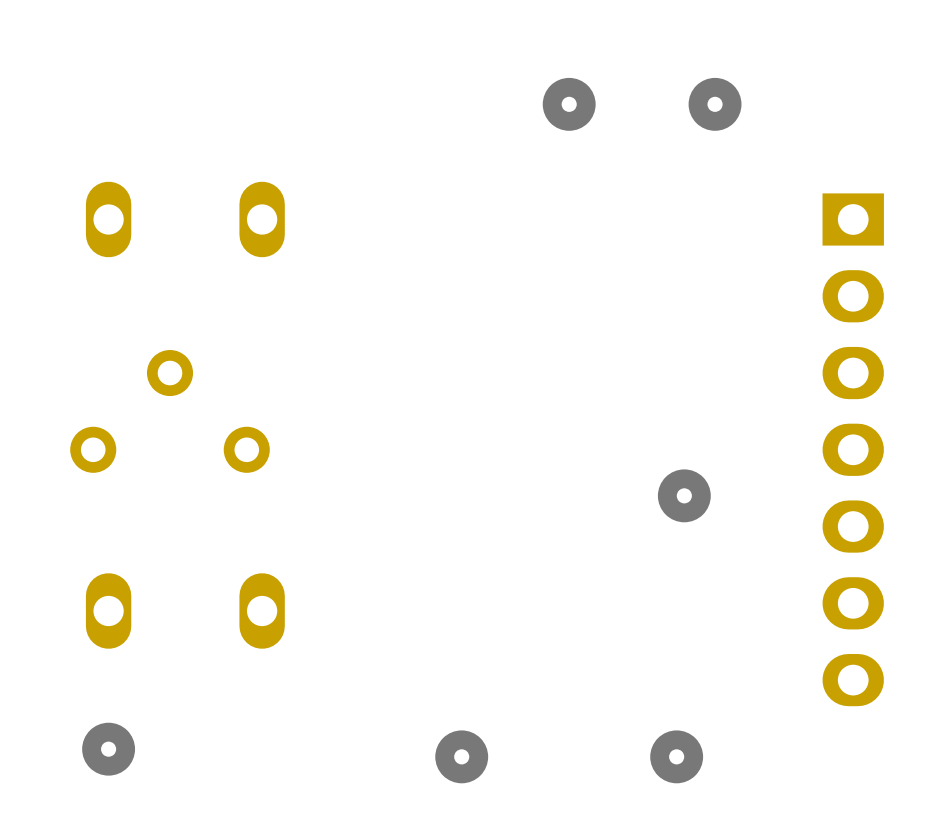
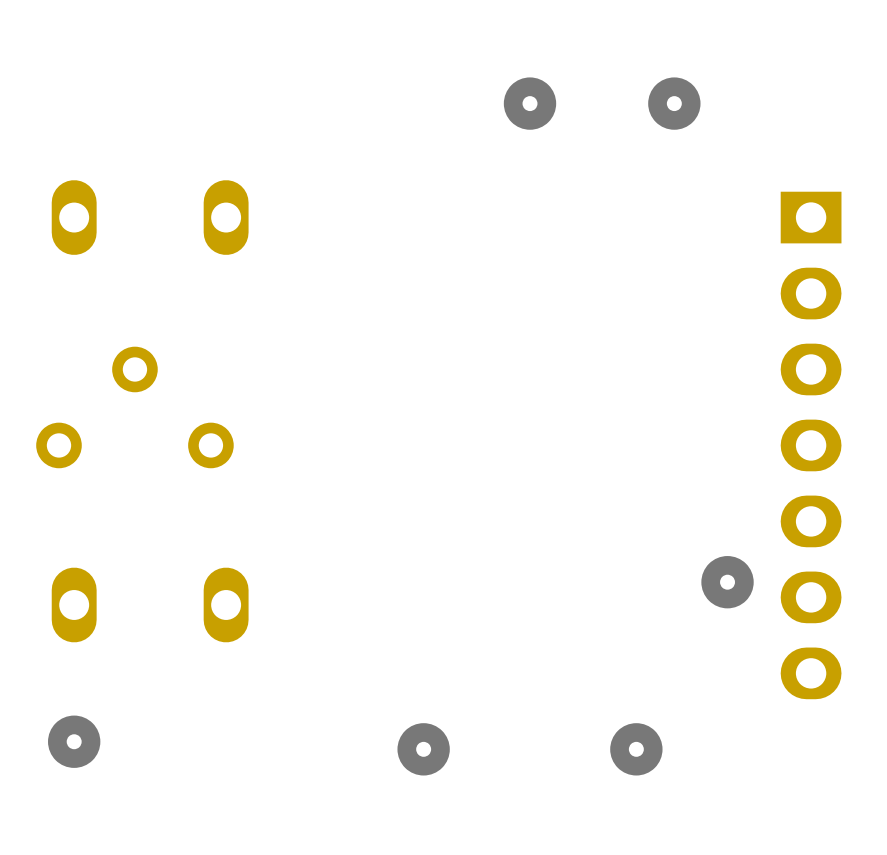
via position: (684, 495) -> (727, 582)

